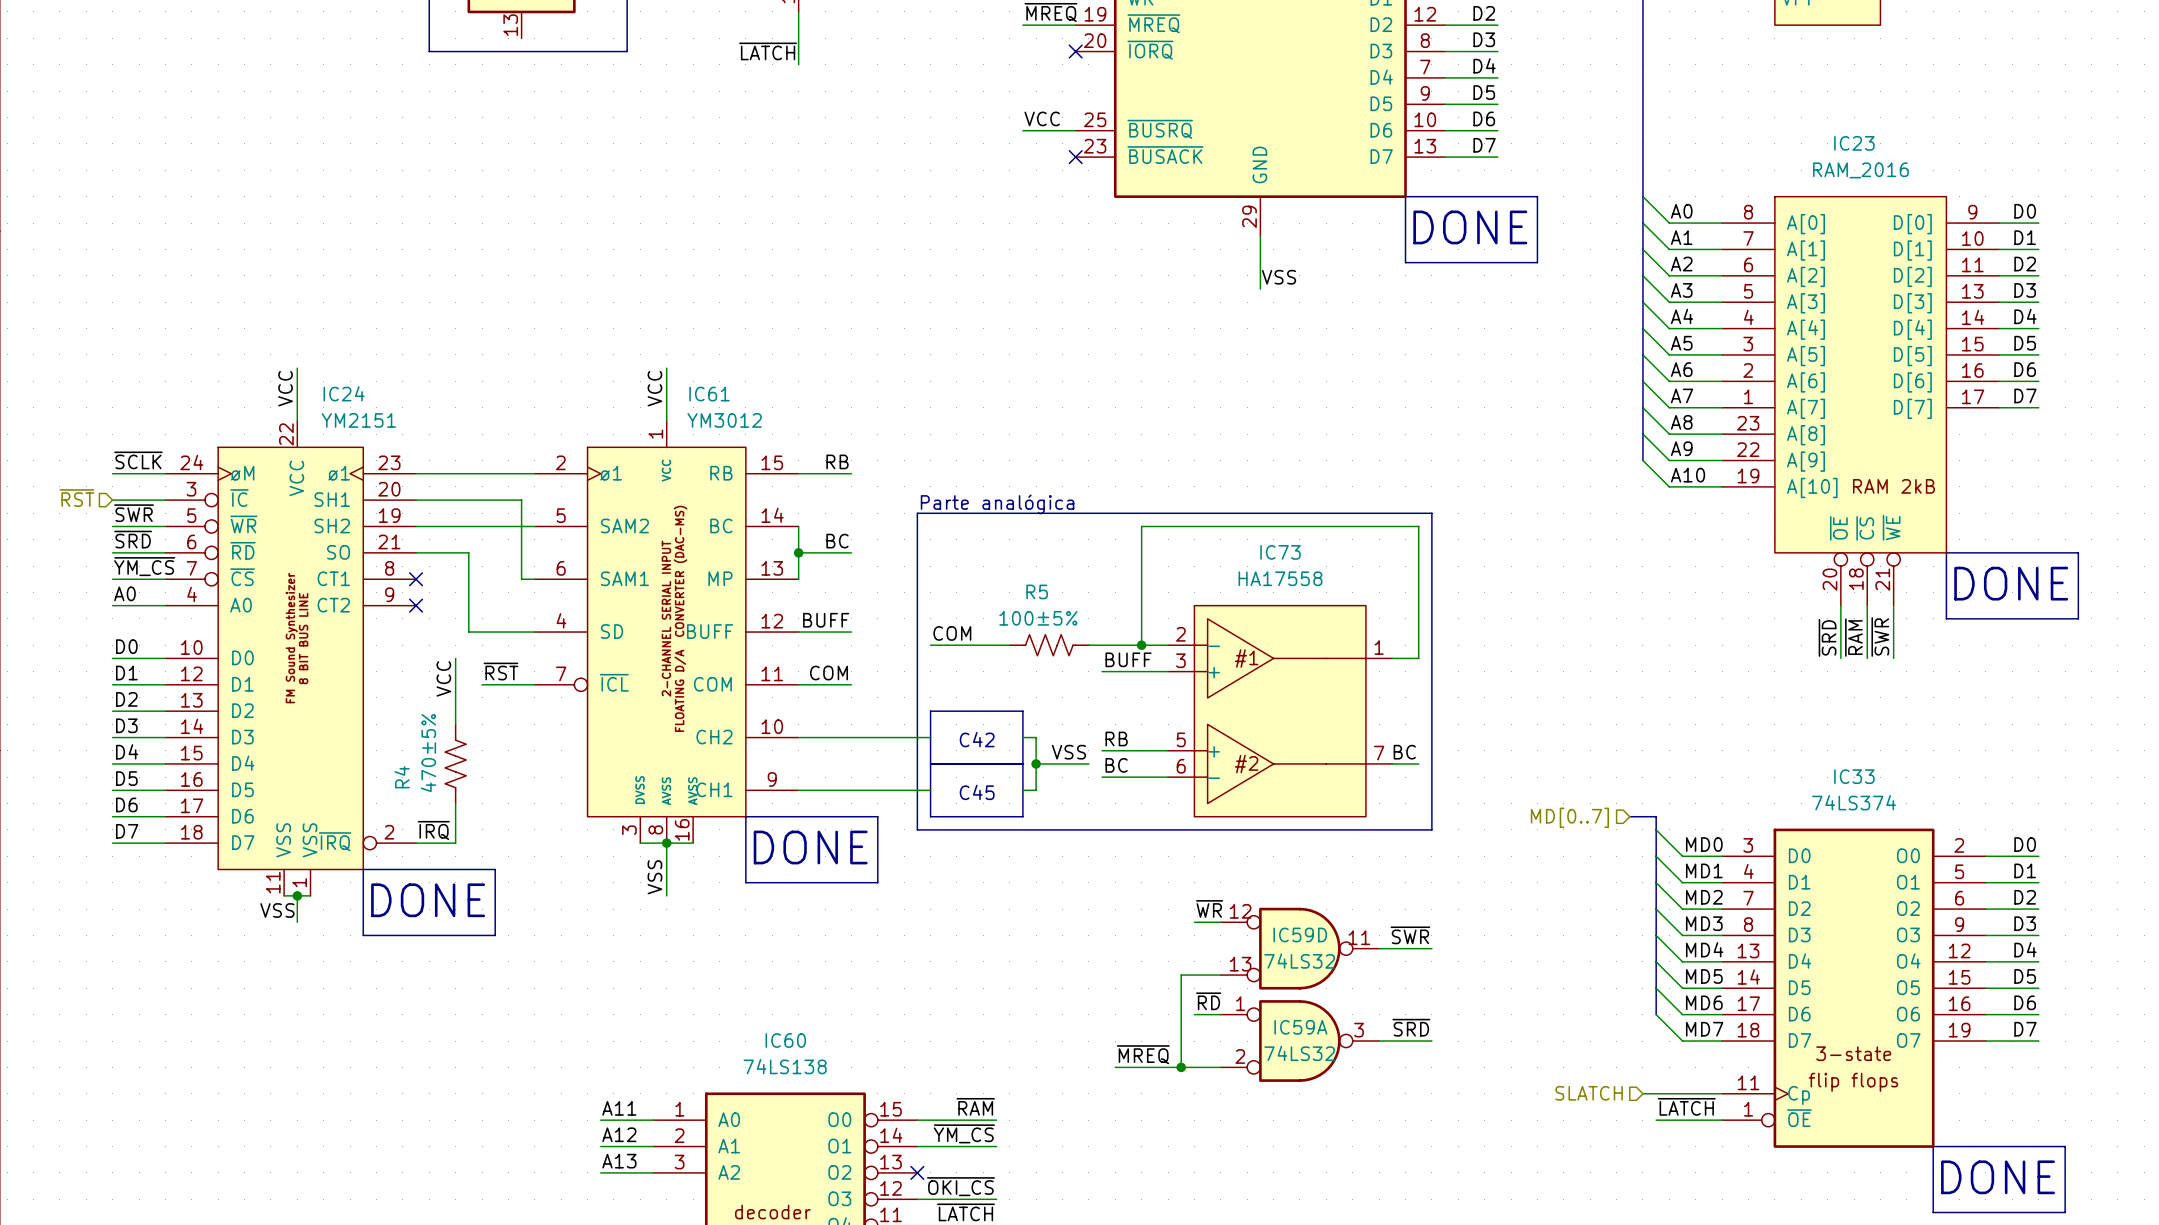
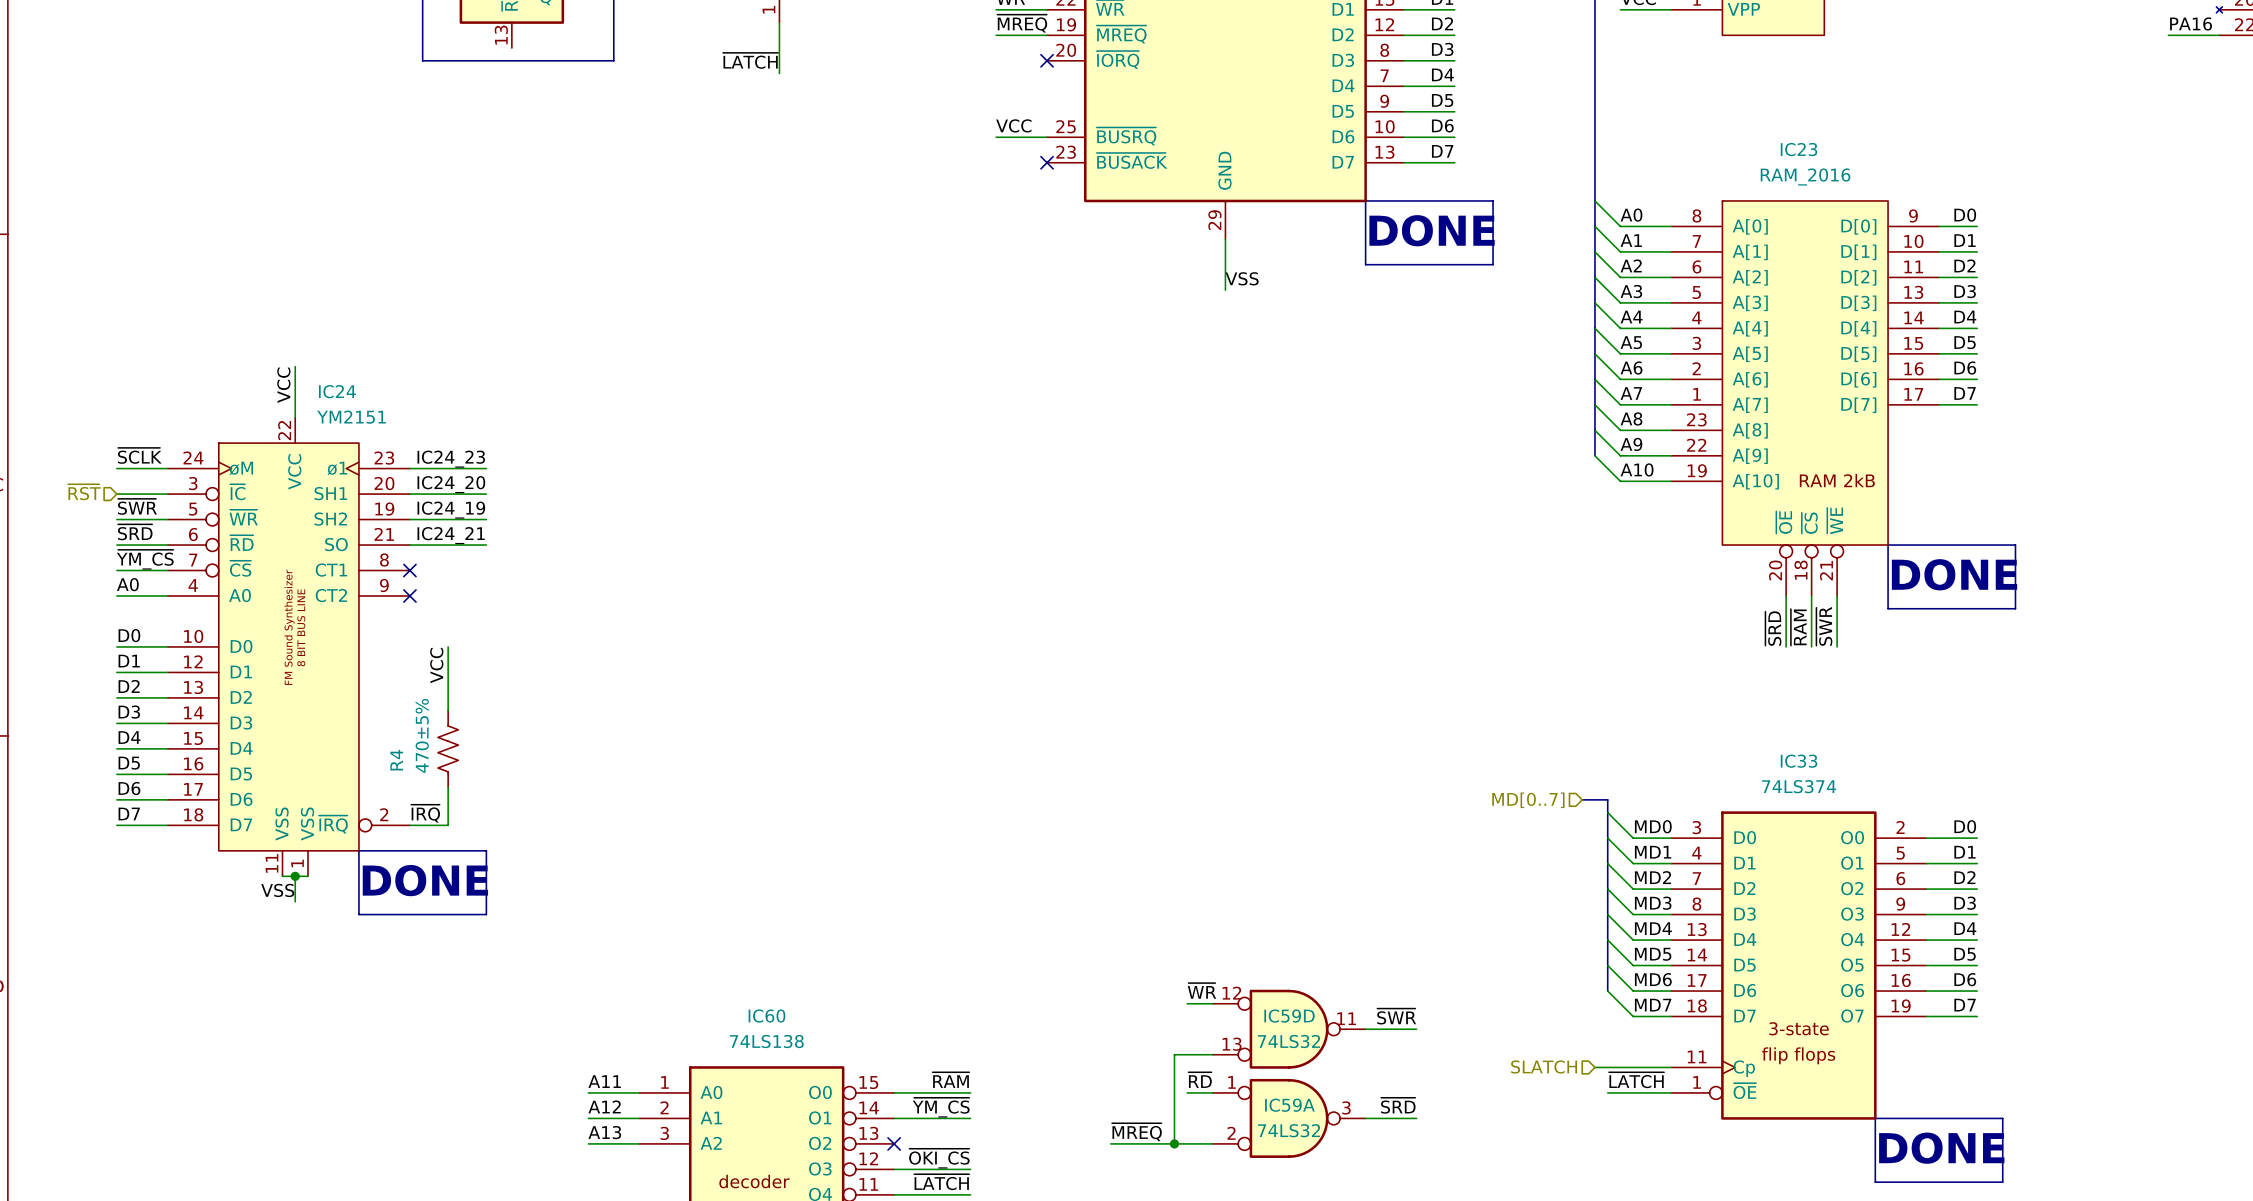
wire: (666, 368) (666, 420) -> none
label: VCC (654, 388) -> none
label: RB (837, 461) -> none
label: none -> IC24_23 (451, 459)
wire: (495, 473) (534, 473) -> none
wire: (798, 473) (851, 473) -> none
label: none -> IC24_20 (451, 484)
wire: (495, 500) (521, 500) (521, 579) (534, 579) -> none
text: Parte analógica (997, 504) -> none
line: (917, 513) (1431, 513) (1431, 829) (917, 829) (917, 513) -> none
label: none -> IC24_19 (451, 510)
wire: (495, 526) (534, 526) -> none
wire: (798, 526) (798, 579) -> none
label: none -> IC24_21 (451, 535)
label: BC (837, 541) -> none
wire: (468, 552) (468, 632) (534, 632) -> (460, 545) (486, 545)
wire: (798, 552) (851, 552) -> none
junction: (798, 552) -> none
label: BUFF (826, 620) -> none
IC61: YM3012 (666, 632) -> none
wire: (798, 632) (851, 632) -> none
label: COM (952, 633) -> none
wire: (930, 645) (1009, 645) -> none
R5: 100±5% (1049, 645) -> none
wire: (1088, 645) (1168, 645) -> none
wire: (1141, 645) (1141, 526) (1418, 526) (1418, 658) (1392, 658) -> none
junction: (1141, 645) -> none
label: BUFF (1128, 659) -> none
label: ~{RST} (500, 671) -> none
wire: (1102, 671) (1168, 671) -> none
label: COM (829, 673) -> none
wire: (482, 684) (534, 684) -> none
wire: (798, 684) (851, 684) -> none
line: (930, 711) (1022, 711) (1022, 816) (930, 816) (930, 711) -> none
IC73: HA17558 (1280, 711) -> none
wire: (798, 737) (930, 737) -> none
wire: (1022, 737) (1036, 737) (1036, 790) (1022, 790) -> none
label: RB (1116, 738) -> none
text: C42 (977, 739) -> none
wire: (1102, 750) (1168, 750) -> none
label: VSS (1068, 752) -> none
label: BC (1404, 752) -> none
line: (930, 763) (1022, 763) -> none
wire: (1036, 763) (1088, 763) -> none
junction: (1036, 763) -> none
wire: (1392, 763) (1418, 763) -> none
label: BC (1116, 765) -> none
wire: (1102, 777) (1168, 777) -> none
wire: (798, 790) (930, 790) -> none
text: C45 (977, 792) -> none
line: (745, 816) (877, 816) (877, 882) (745, 882) (745, 816) -> none
wire: (640, 843) (693, 843) -> none
wire: (666, 843) (666, 895) -> none
junction: (666, 843) -> none
text: DONE (810, 847) -> none
label: VSS (654, 877) -> none
label position: ~{WR} (1209, 908) -> ~{WR} (1201, 990)
wire: (1194, 922) (1220, 922) -> (1187, 1003) (1212, 1003)
label position: ~{SWR} (1410, 935) -> ~{SWR} (1396, 1016)
IC59D position: (1299, 948) -> (1289, 1029)
wire: (1379, 948) (1431, 948) -> (1365, 1029) (1416, 1029)
wire: (1220, 975) (1181, 975) (1181, 1067) -> (1212, 1054) (1174, 1054) (1174, 1143)
label position: ~{RD} (1208, 1001) -> ~{RD} (1200, 1080)
wire: (1194, 1014) (1220, 1014) -> (1187, 1092) (1212, 1092)
label position: ~{SRD} (1411, 1027) -> ~{SRD} (1398, 1105)
IC59A position: (1299, 1041) -> (1289, 1118)
wire: (1379, 1041) (1431, 1041) -> (1365, 1118) (1416, 1118)
label position: ~{MREQ} (1143, 1054) -> ~{MREQ} (1136, 1132)
wire: (1115, 1067) (1220, 1067) -> (1110, 1143) (1212, 1143)
junction: (1181, 1067) -> none
junction: none -> (1174, 1143)

